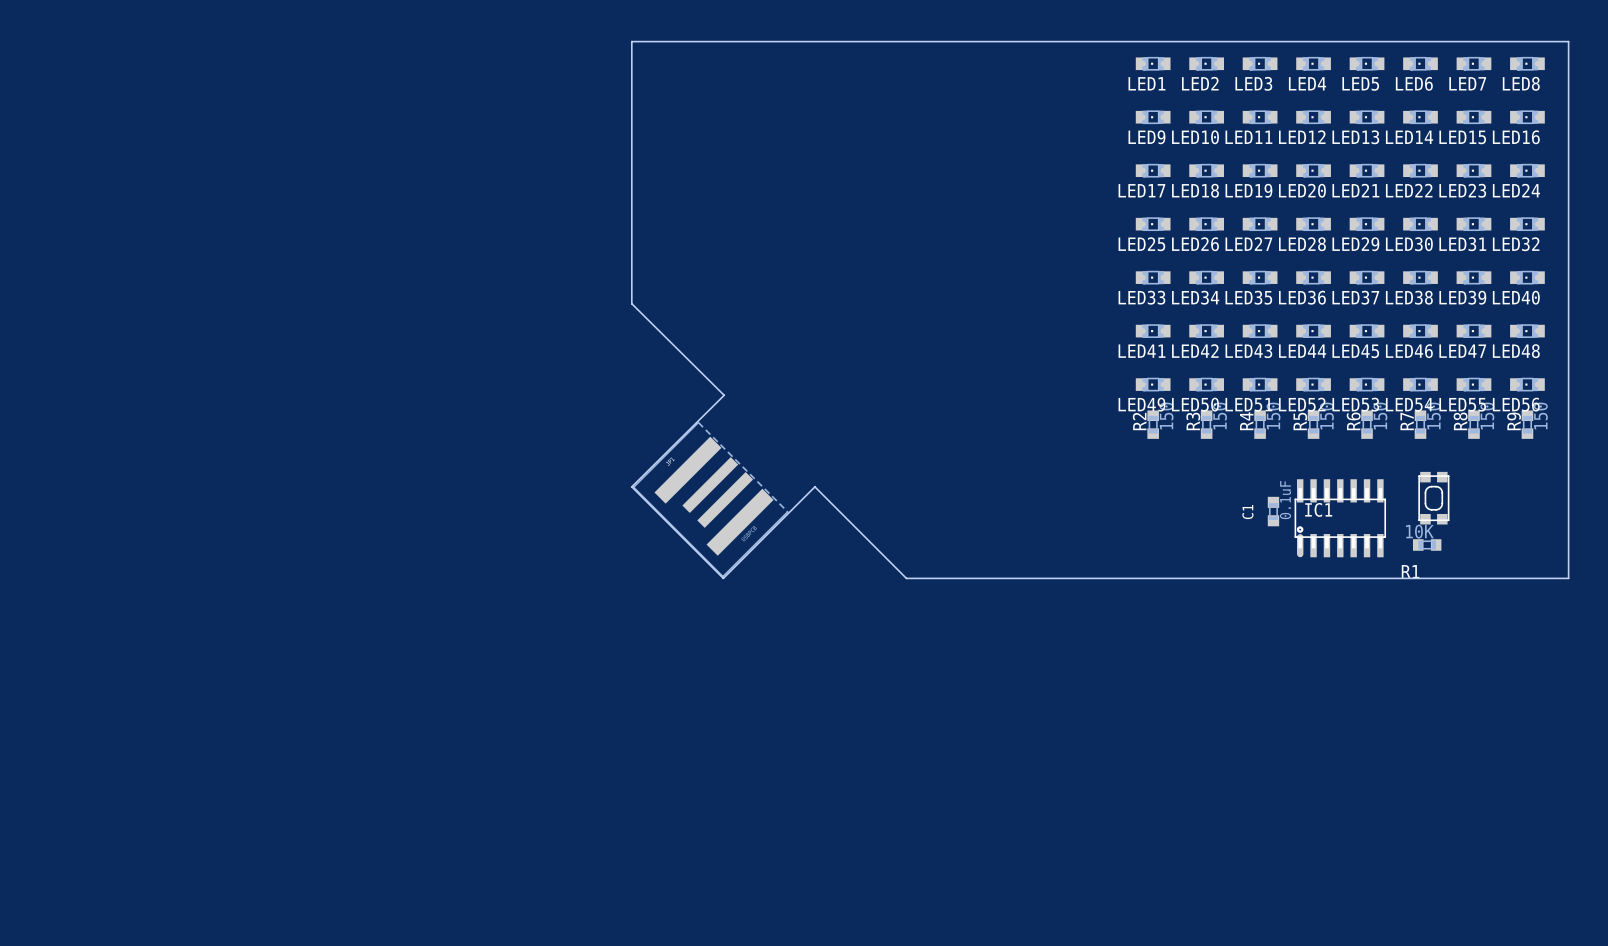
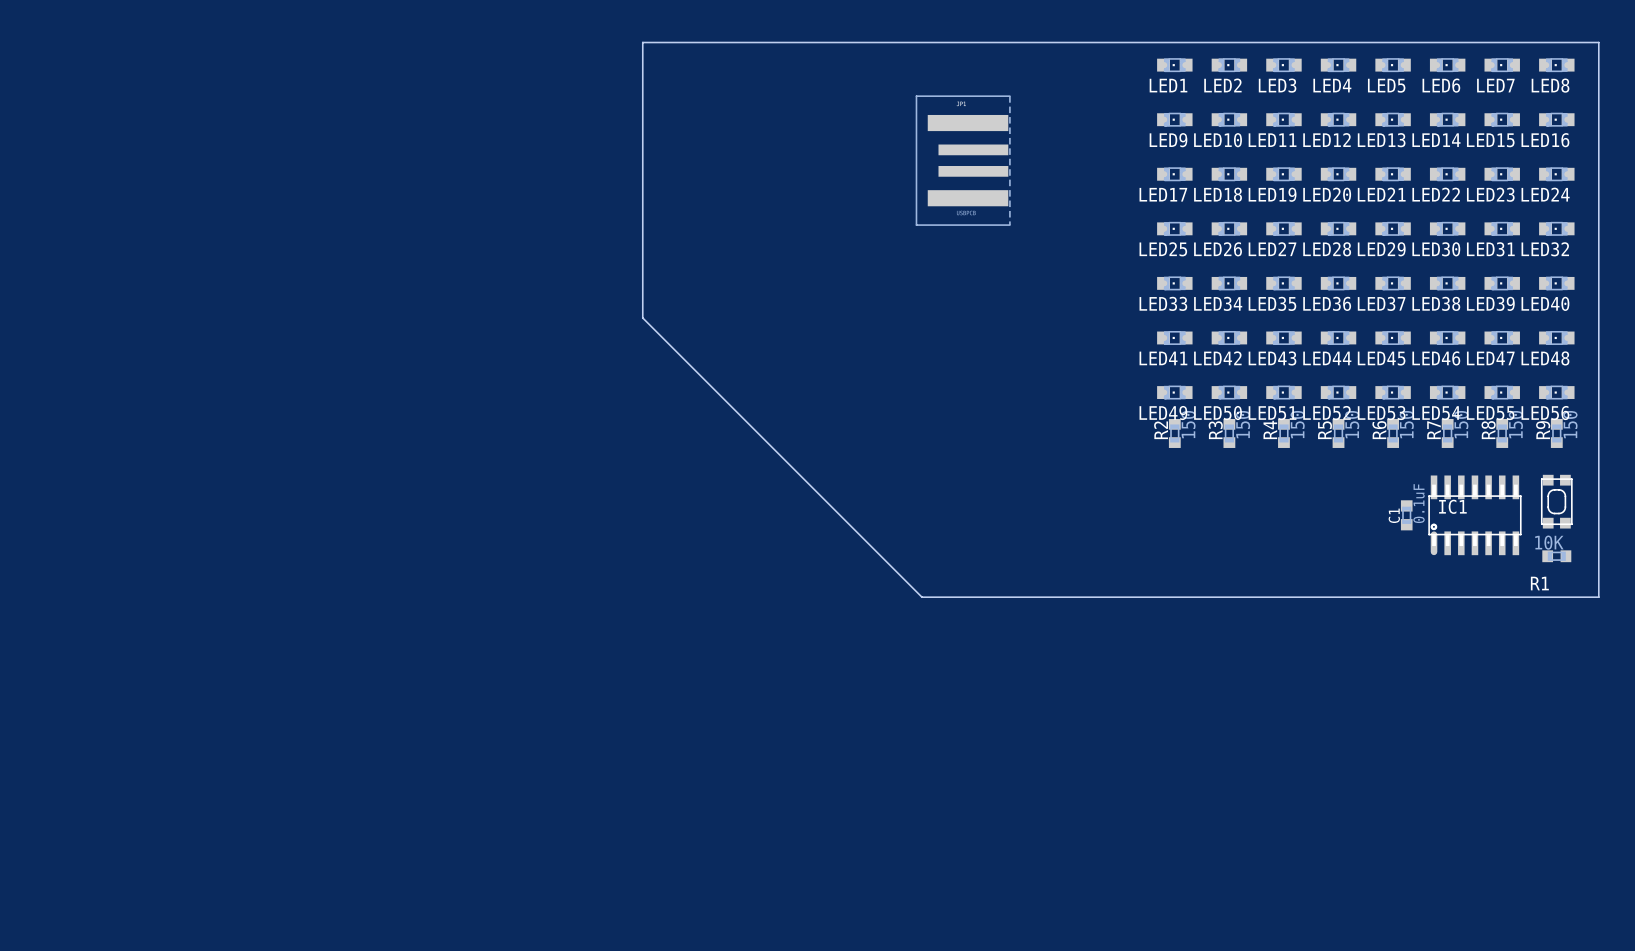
board edge: (631, 303) (724, 395) (631, 486) (723, 578) (814, 486) (906, 578) (1568, 578) -> (642, 310) (642, 317) (921, 597) (1598, 597) (1598, 590)
part position: (1433, 498) -> (1556, 501)
part rotation: 0° (710, 499) -> 45° clockwise (963, 160)
part position: (710, 499) -> (963, 160)
C1 position: (1273, 511) -> (1406, 515)
C1 name position: C1 (1247, 512) -> C1 (1394, 515)
IC1 position: (1340, 518) -> (1474, 515)
R1 position: (1427, 544) -> (1556, 556)

